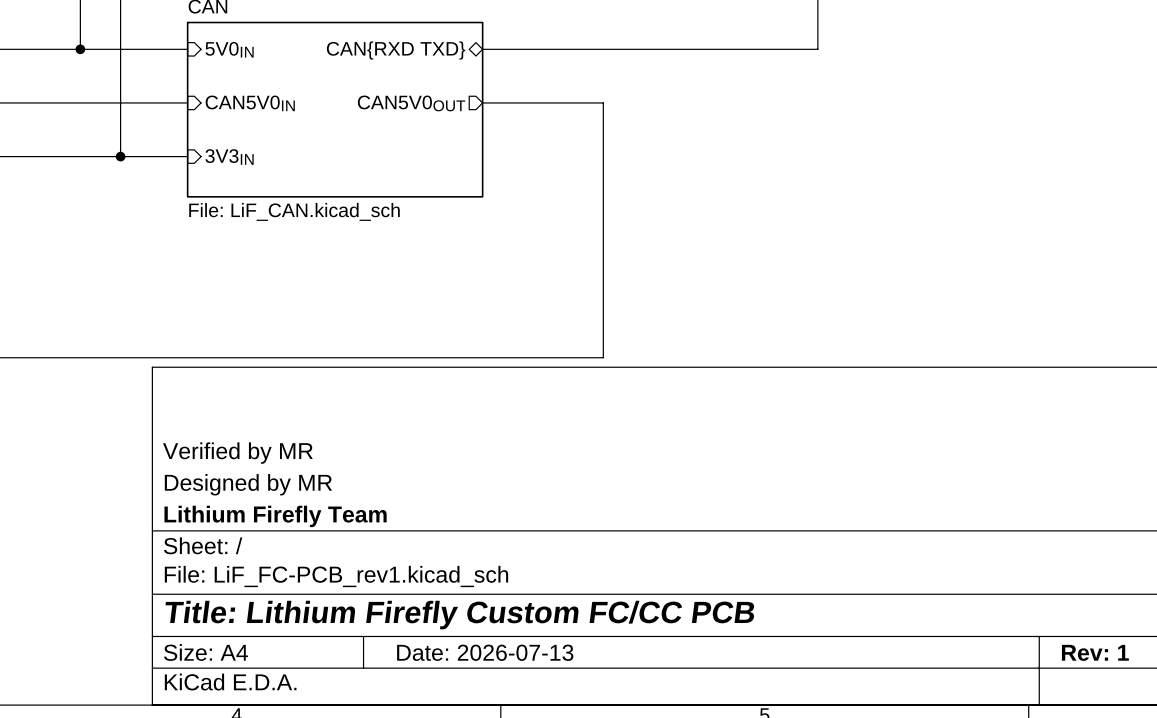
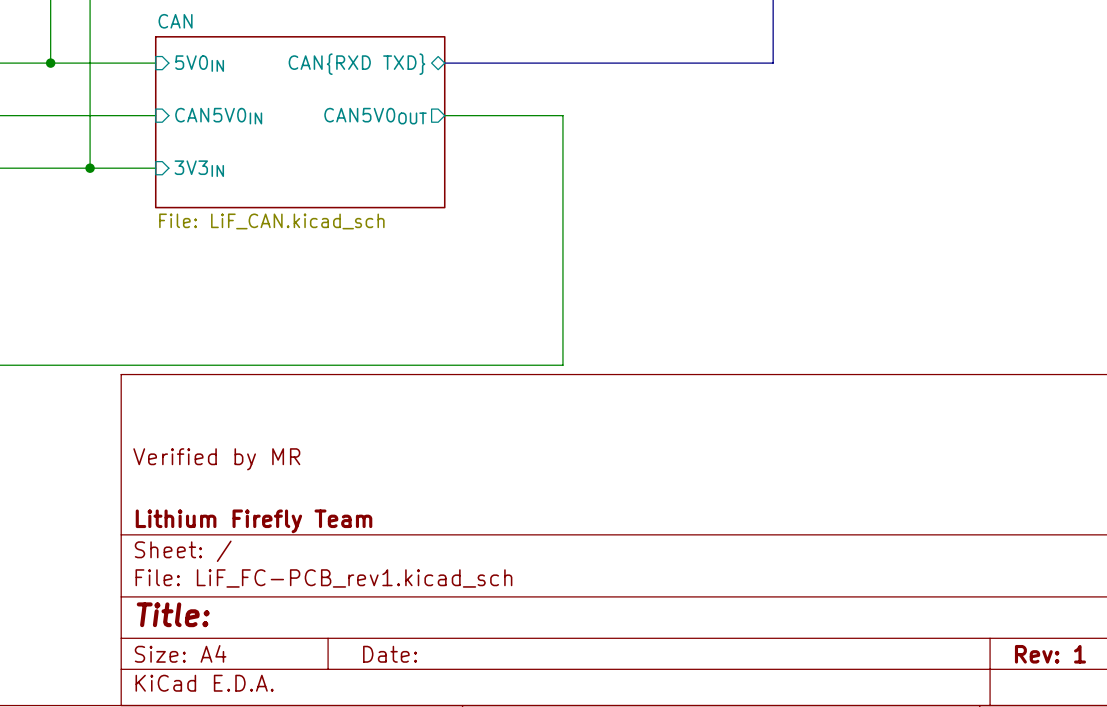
title block: Designed by MR (248, 484) -> none
title block: Title: Lithium Firefly Custom FC/CC PCB (459, 615) -> Title: (173, 614)
title block: Date: 2026-07-13 (485, 652) -> Date: (390, 654)

